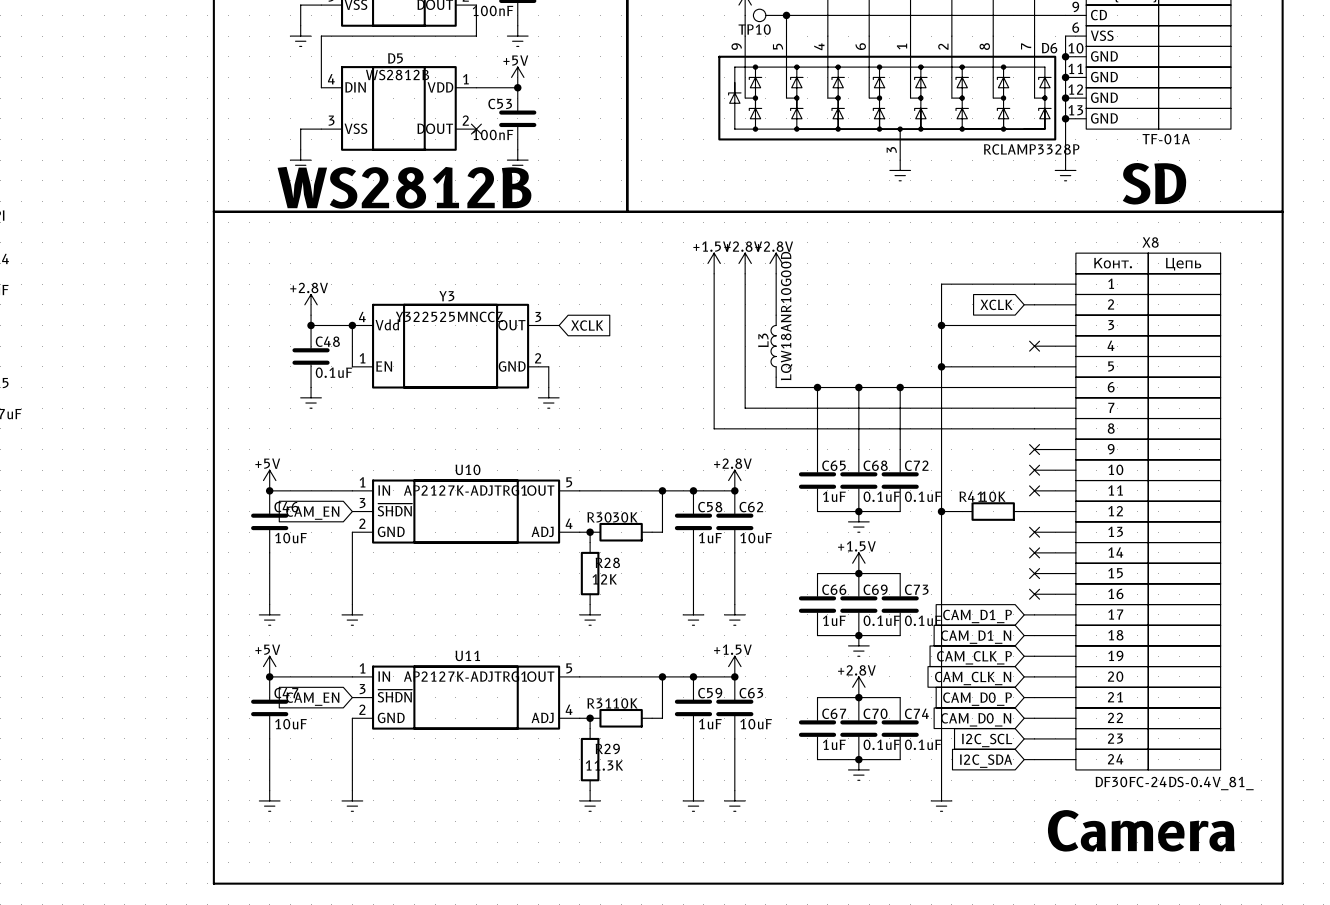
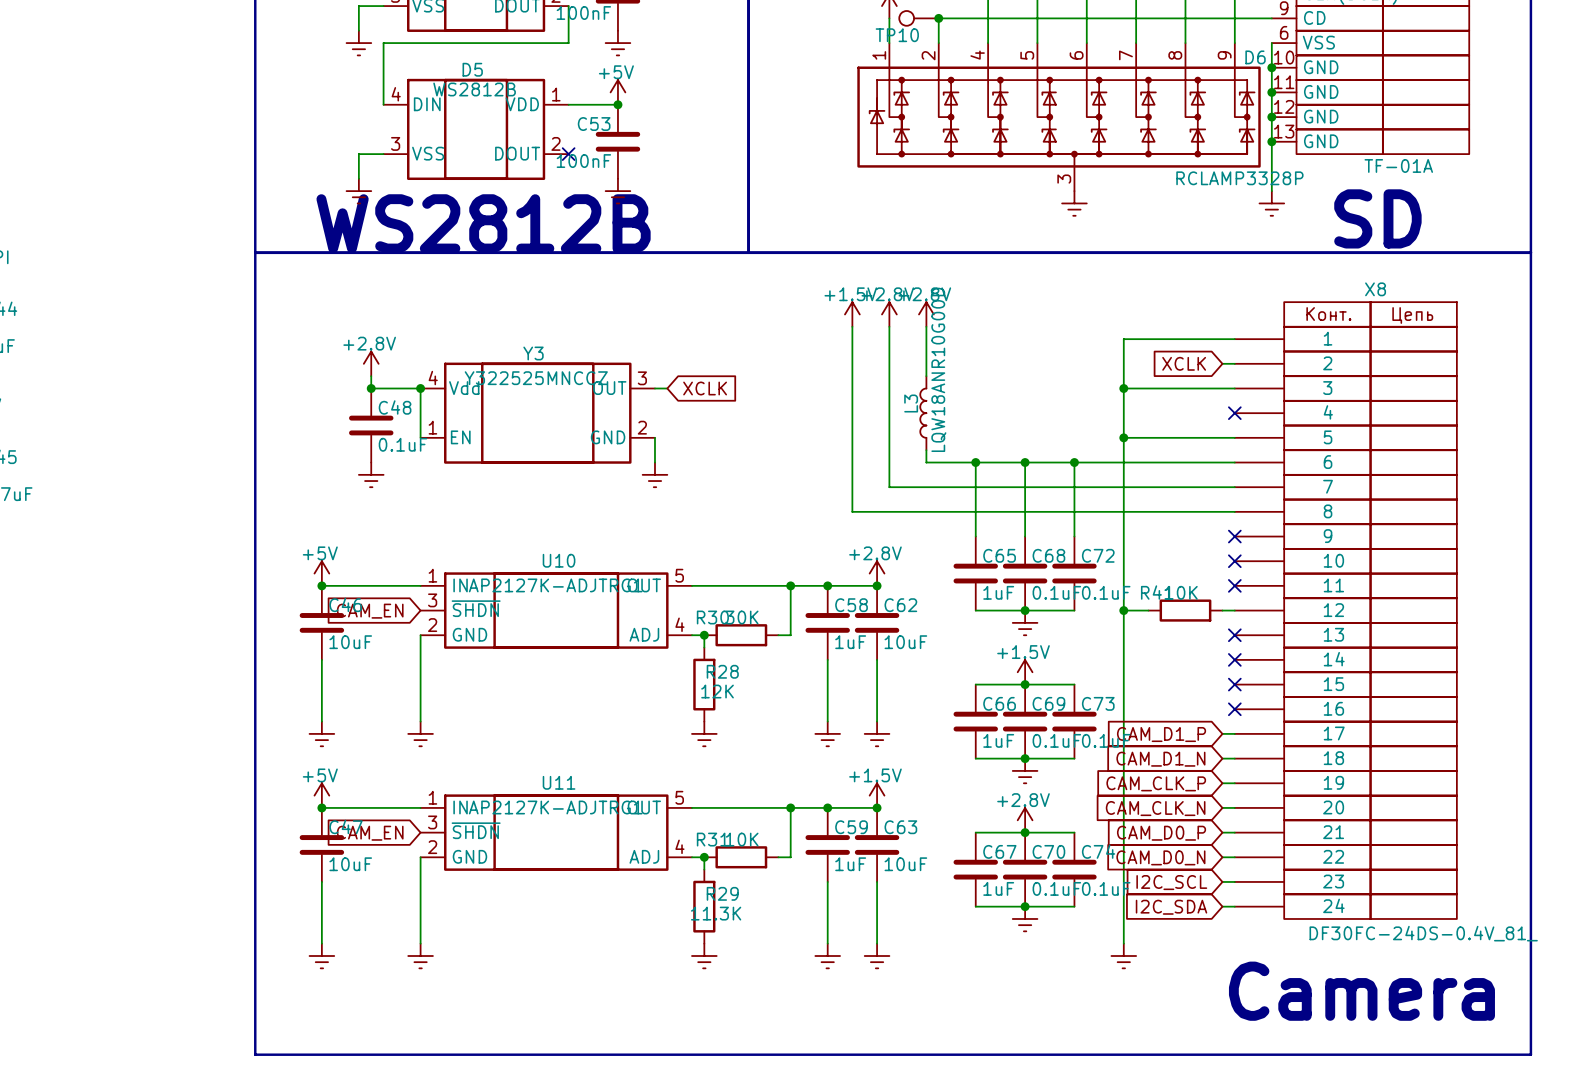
D6 pin number: 9 (736, 46) -> 1 (879, 55)
D6 pin number: 5 (778, 46) -> 2 (928, 55)
D6 pin number: 6 (860, 46) -> 5 (1027, 55)
D6 pin number: 1 (902, 46) -> 6 (1076, 55)
D6 pin number: 2 (943, 46) -> 7 (1125, 55)
D6 pin number: 7 (1026, 46) -> 9 (1224, 55)

